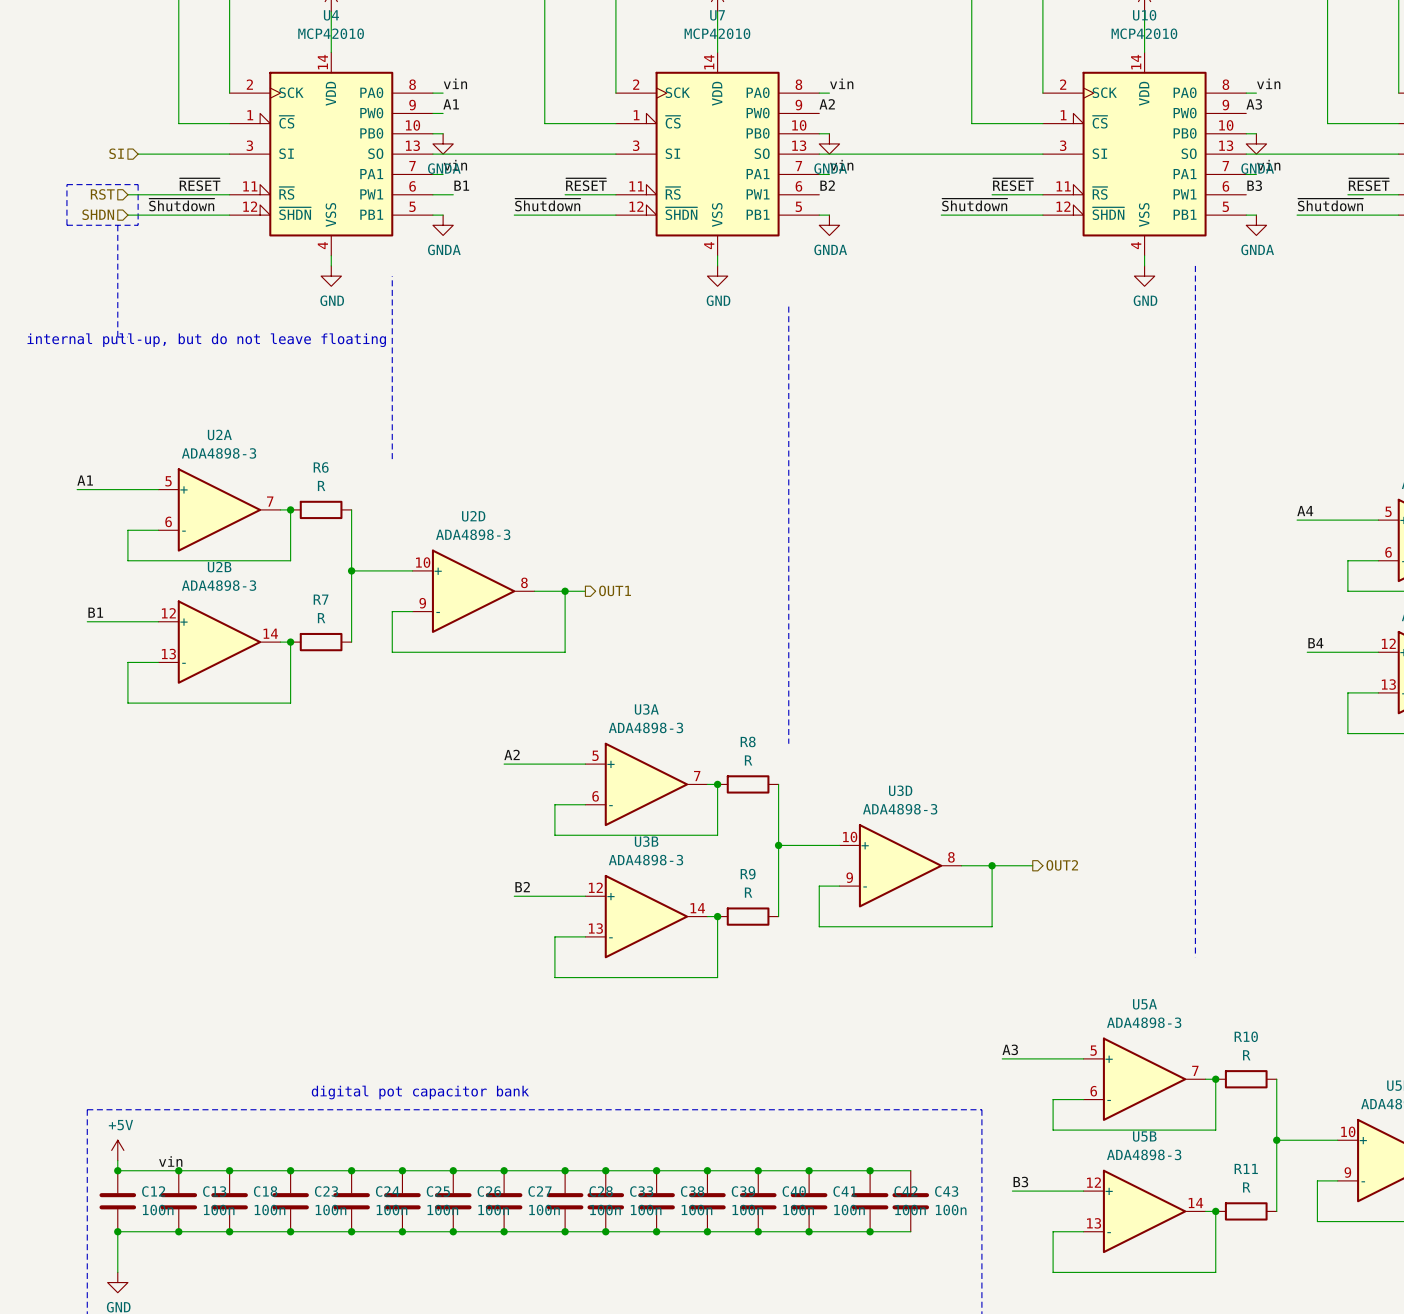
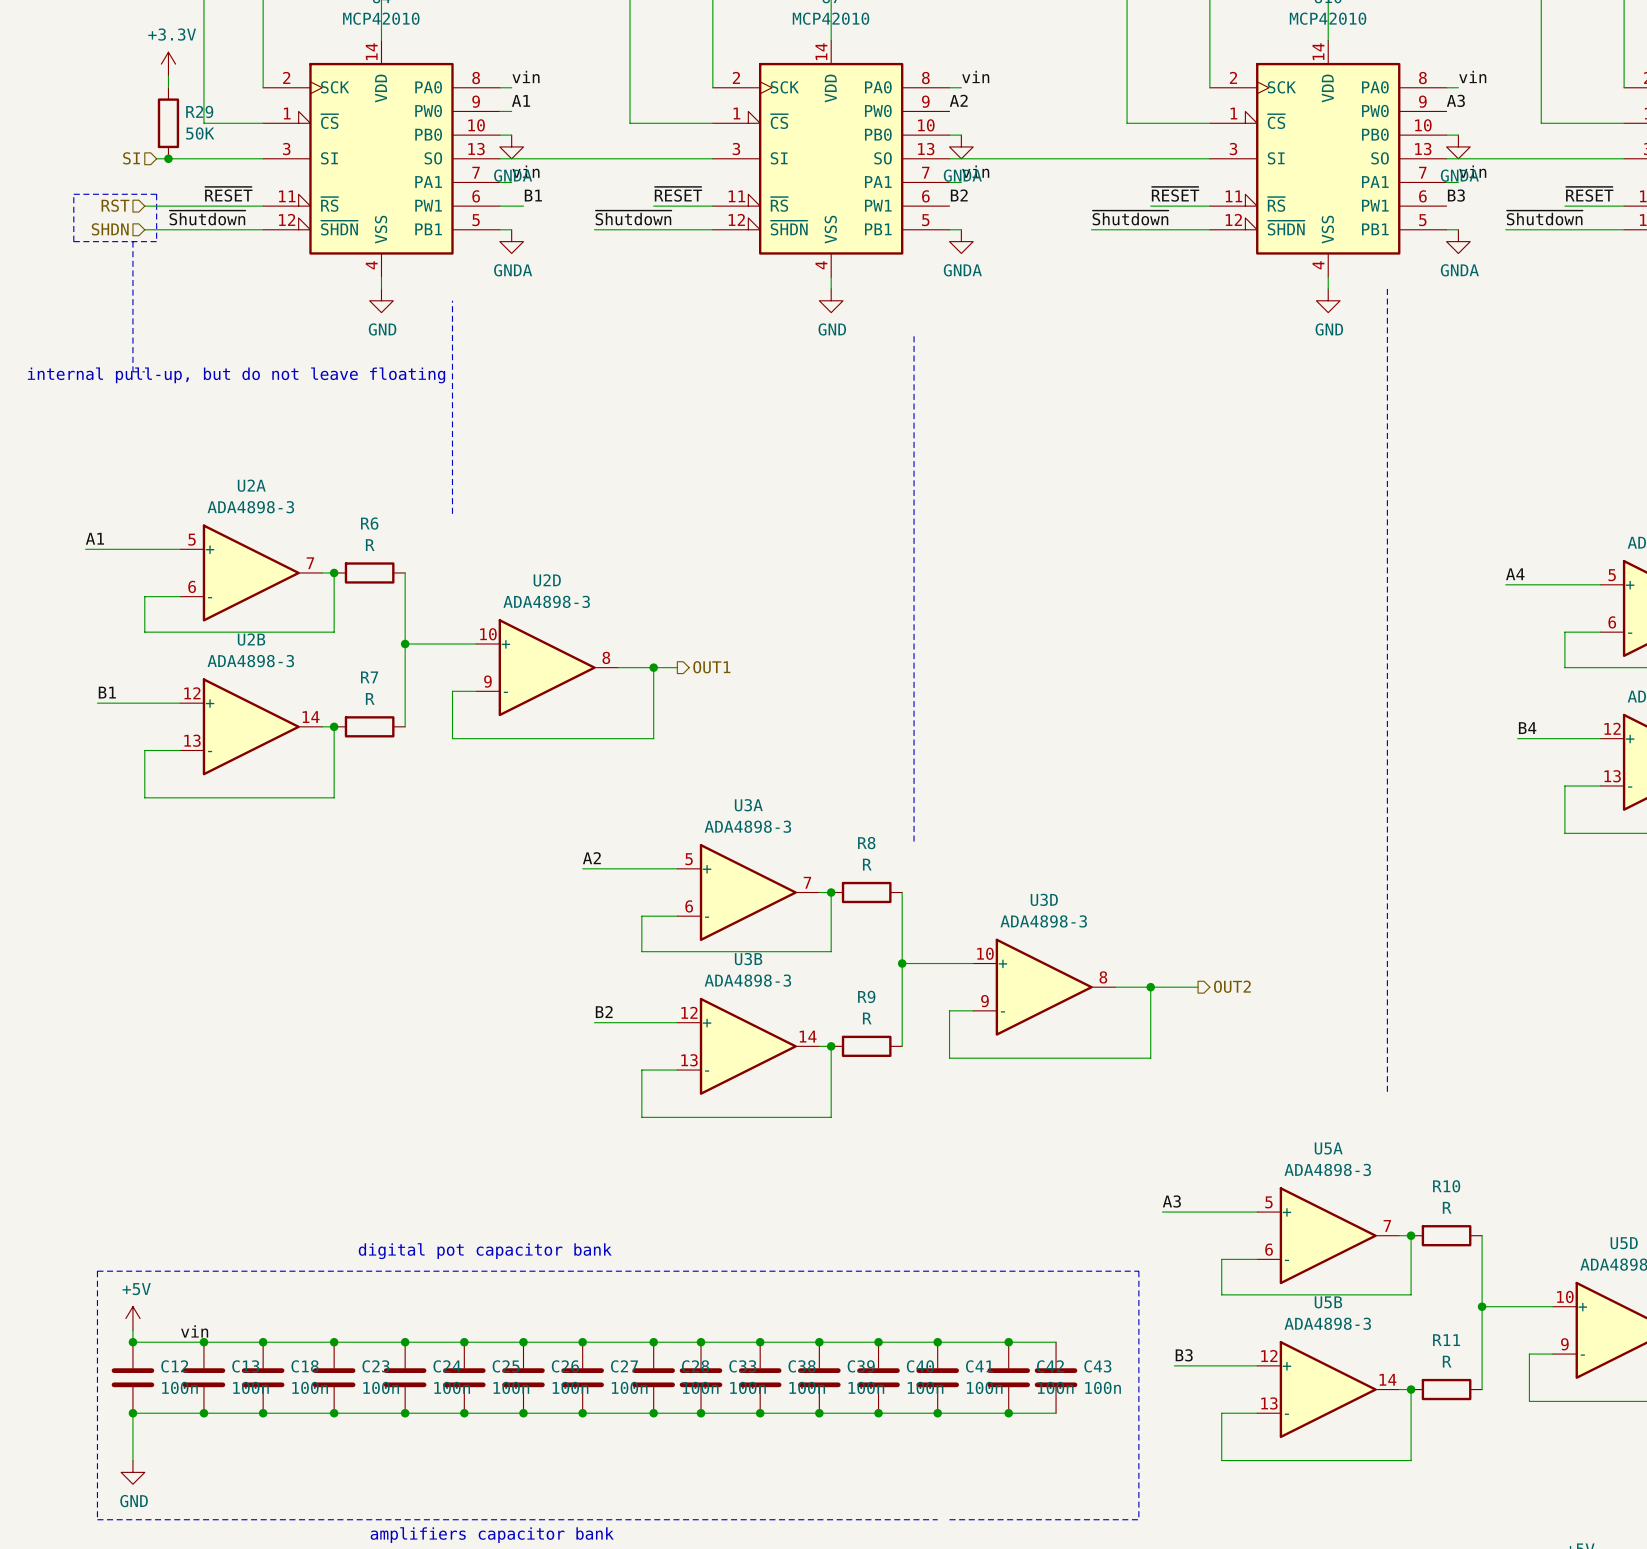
power symbol: none -> +3.3V (168, 64)
wire: none -> (168, 75) (168, 87)
R29: none -> 50K (168, 123)
junction: none -> (168, 158)

